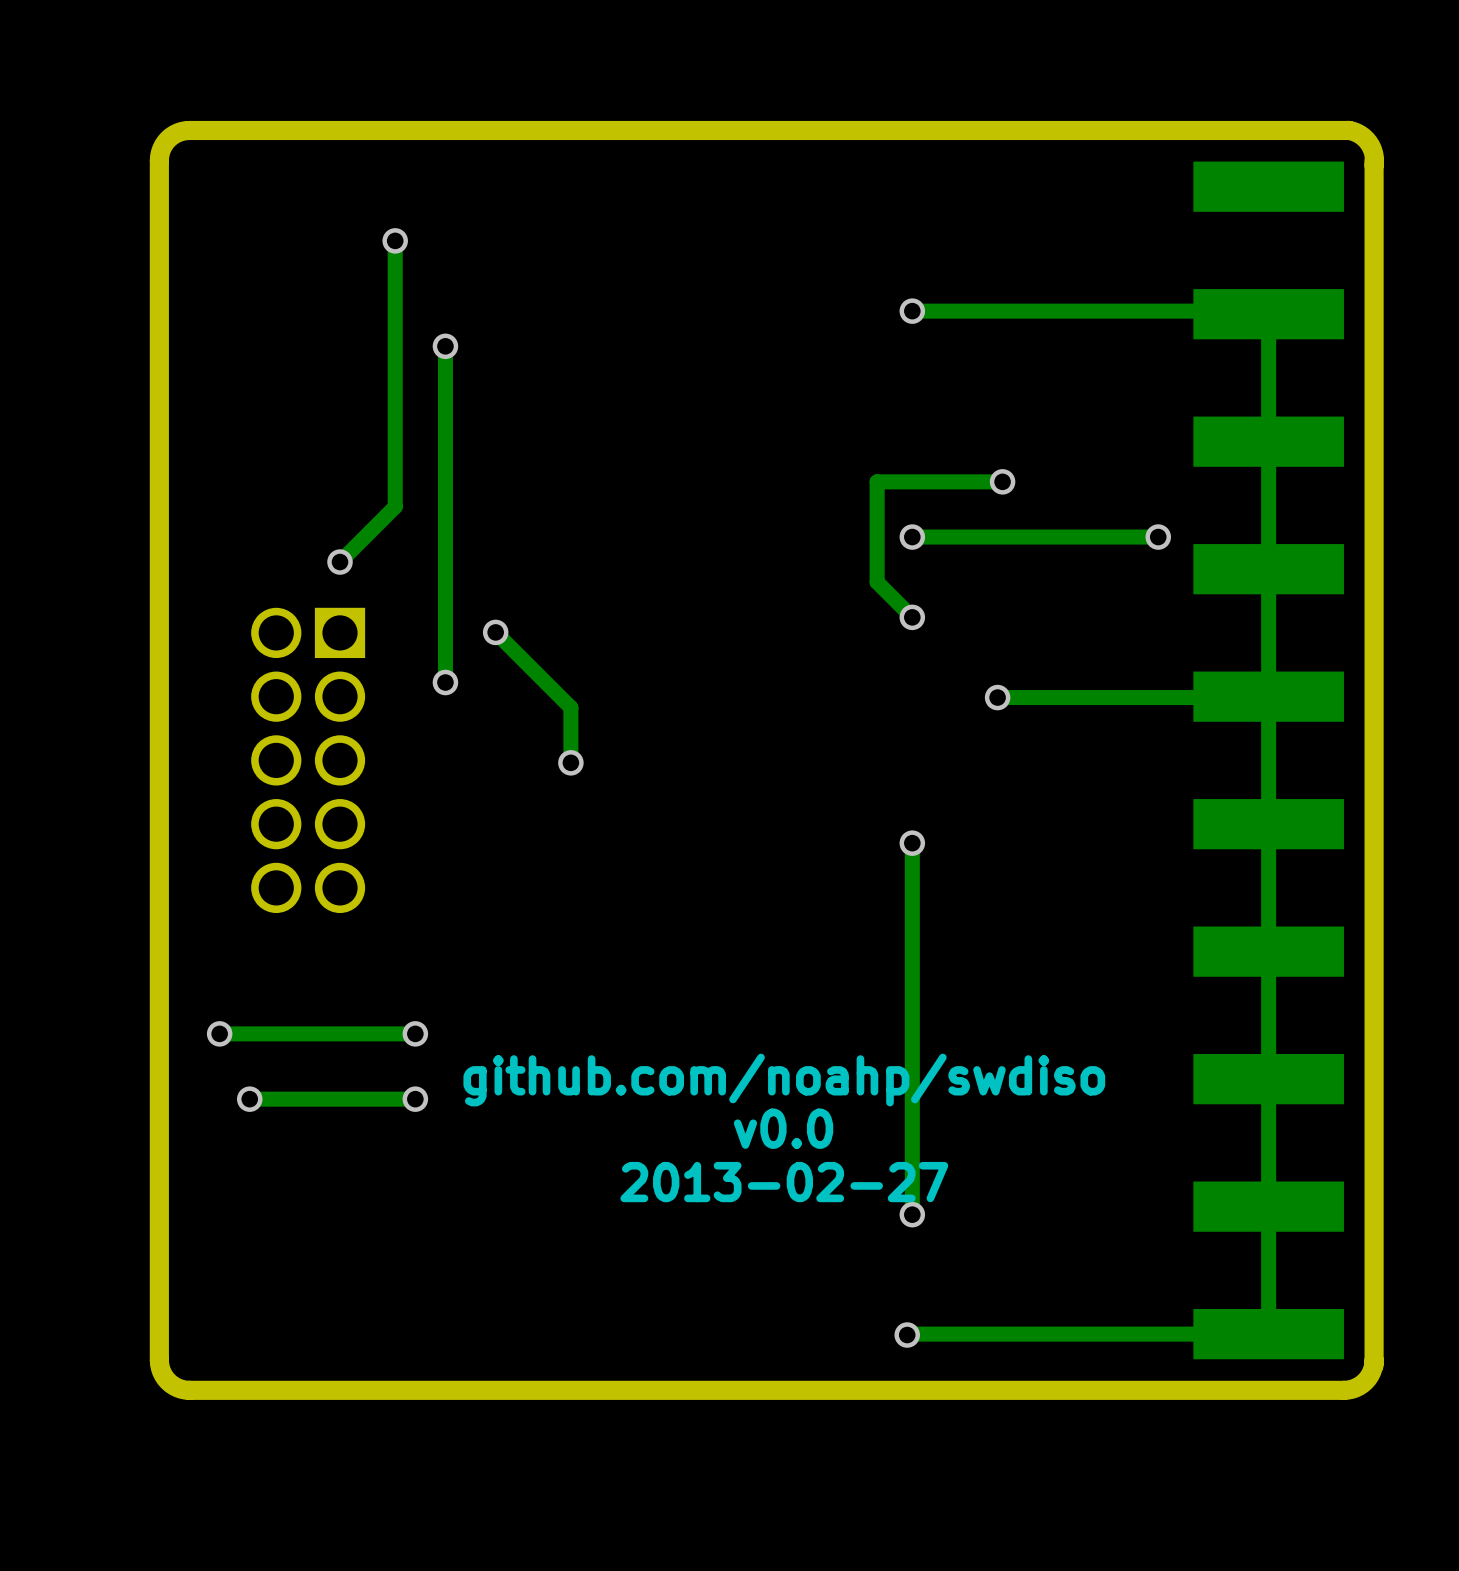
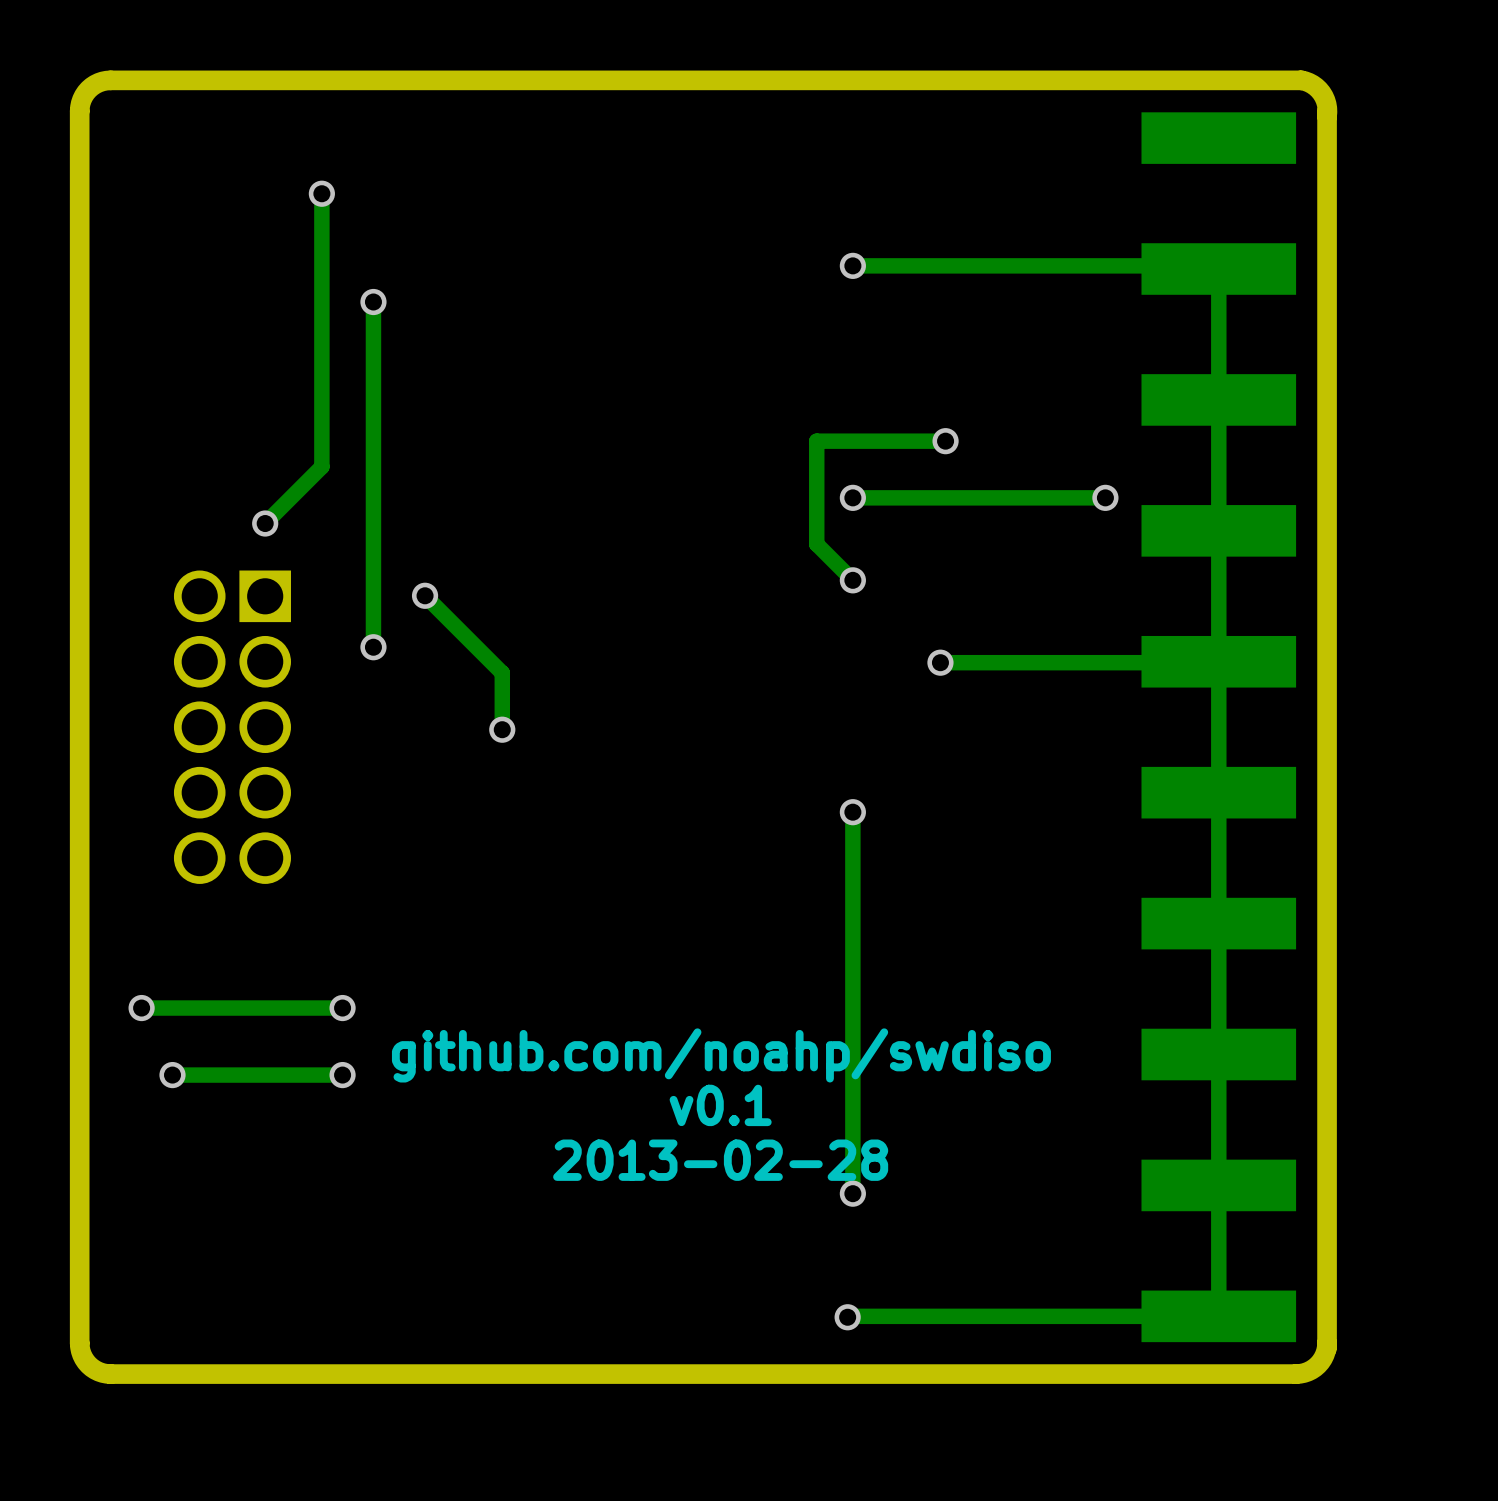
text: v0.0 (783, 1128) -> v0.1 (720, 1105)
text: 2013-02-27 (784, 1182) -> 2013-02-28 (720, 1160)

